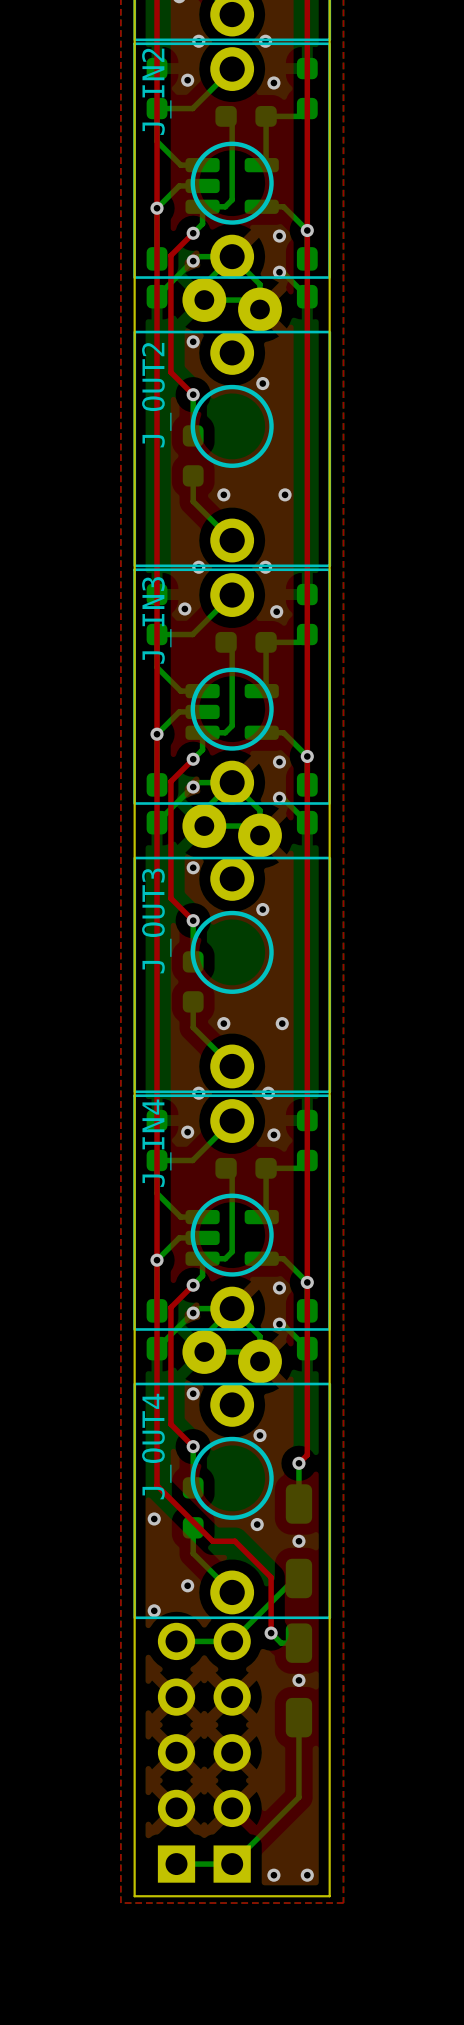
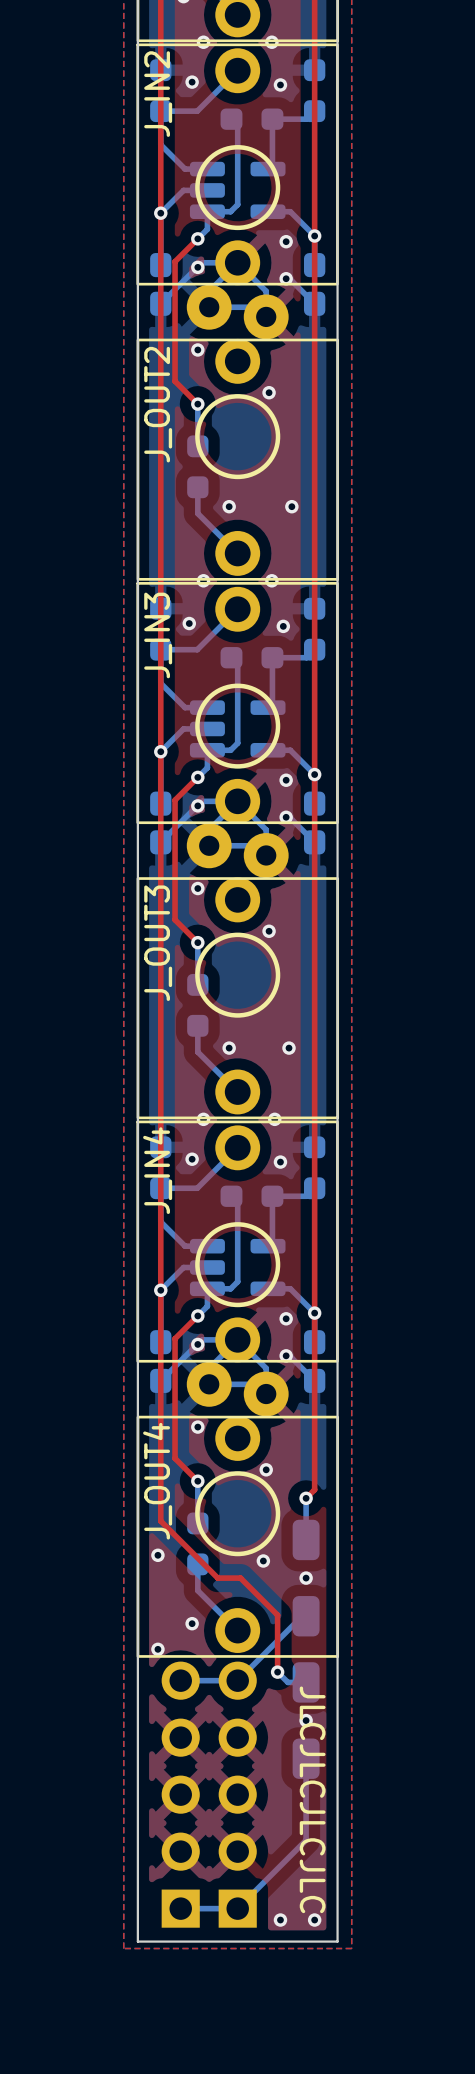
text: none -> JLCJLCJLCJLC (312, 1799)

